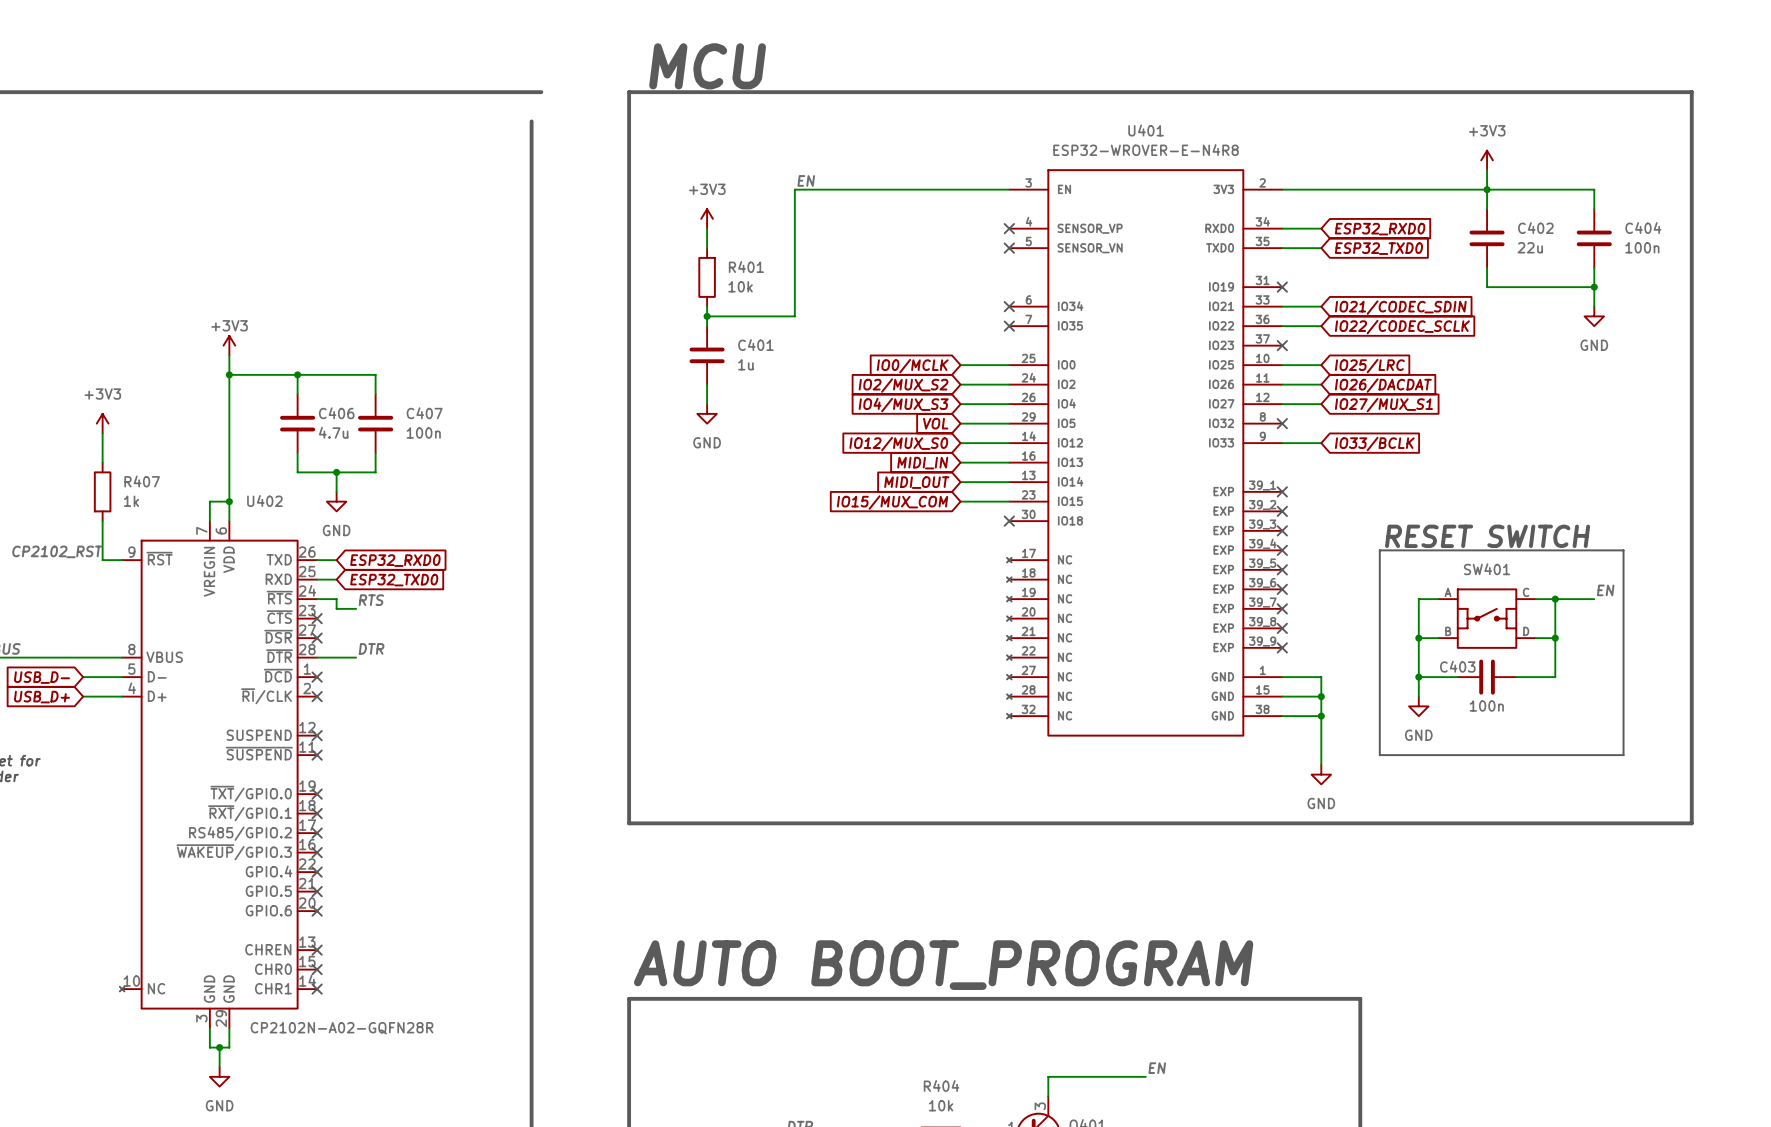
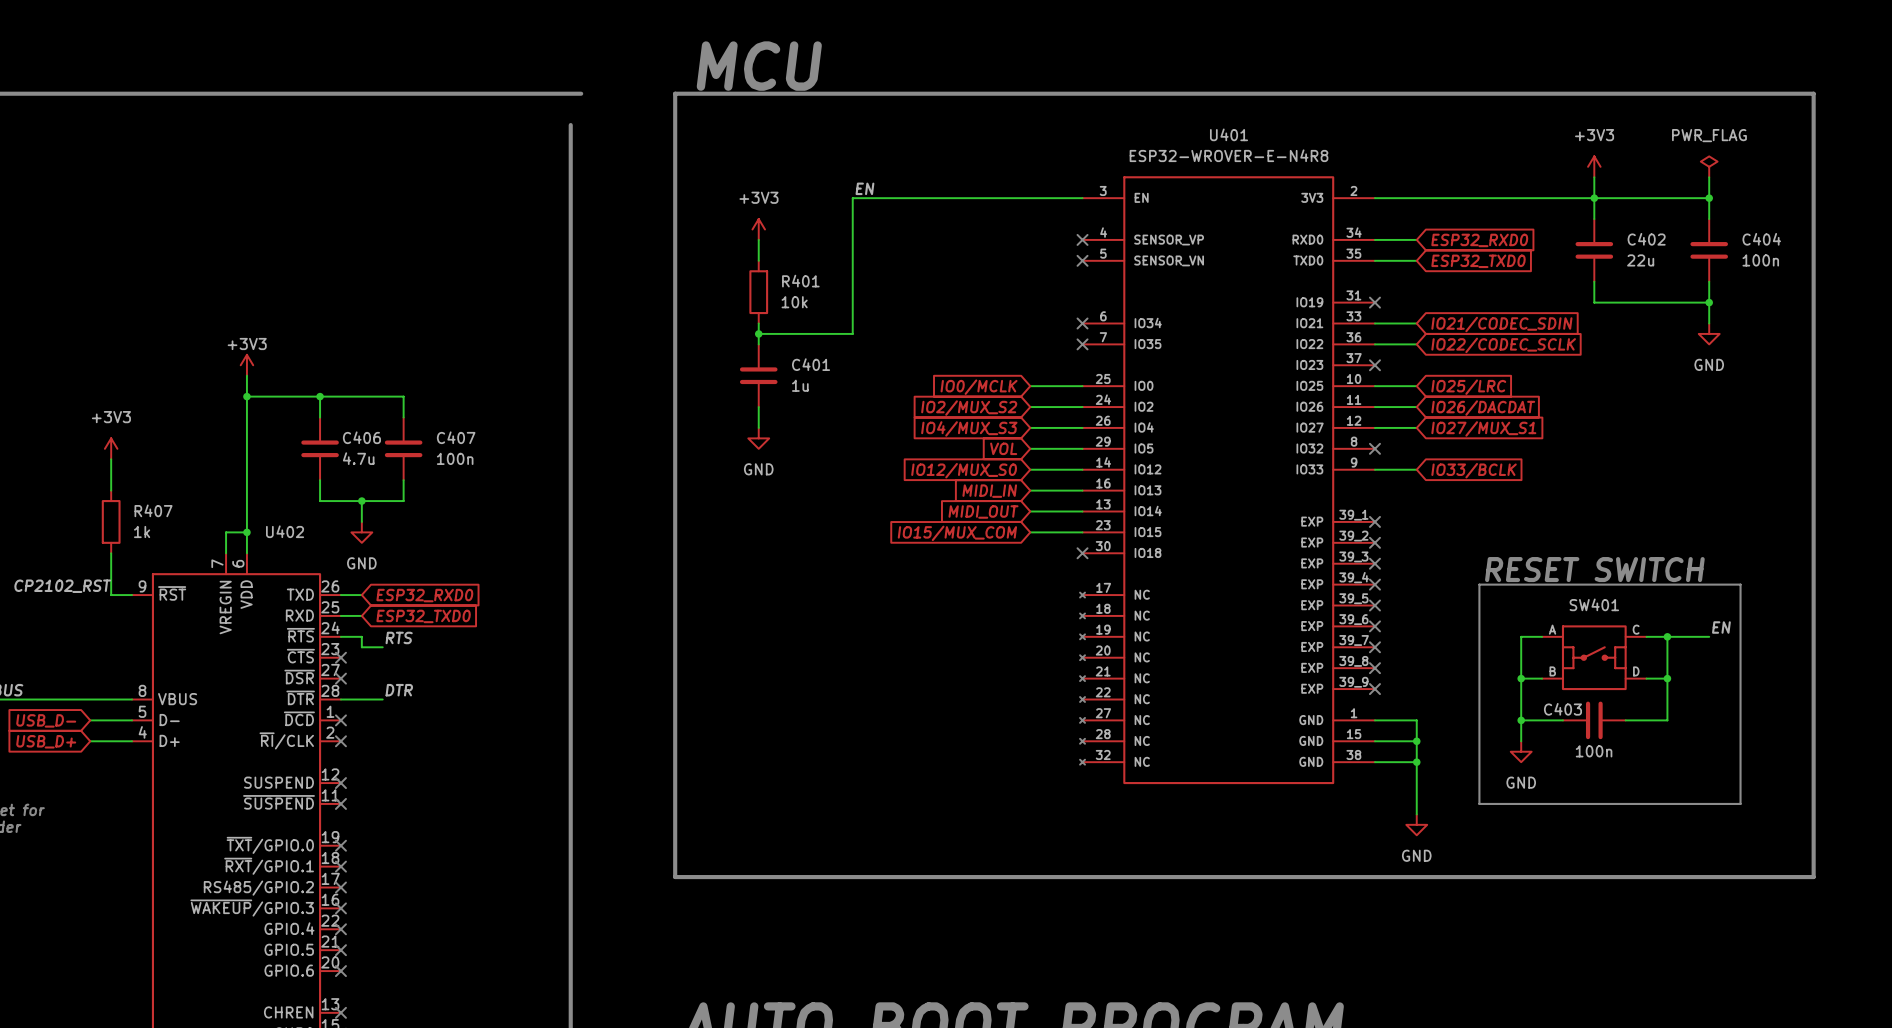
power symbol: none -> PWR_FLAG (1709, 166)
wire: none -> (1709, 177) (1709, 198)
junction: none -> (1709, 198)

